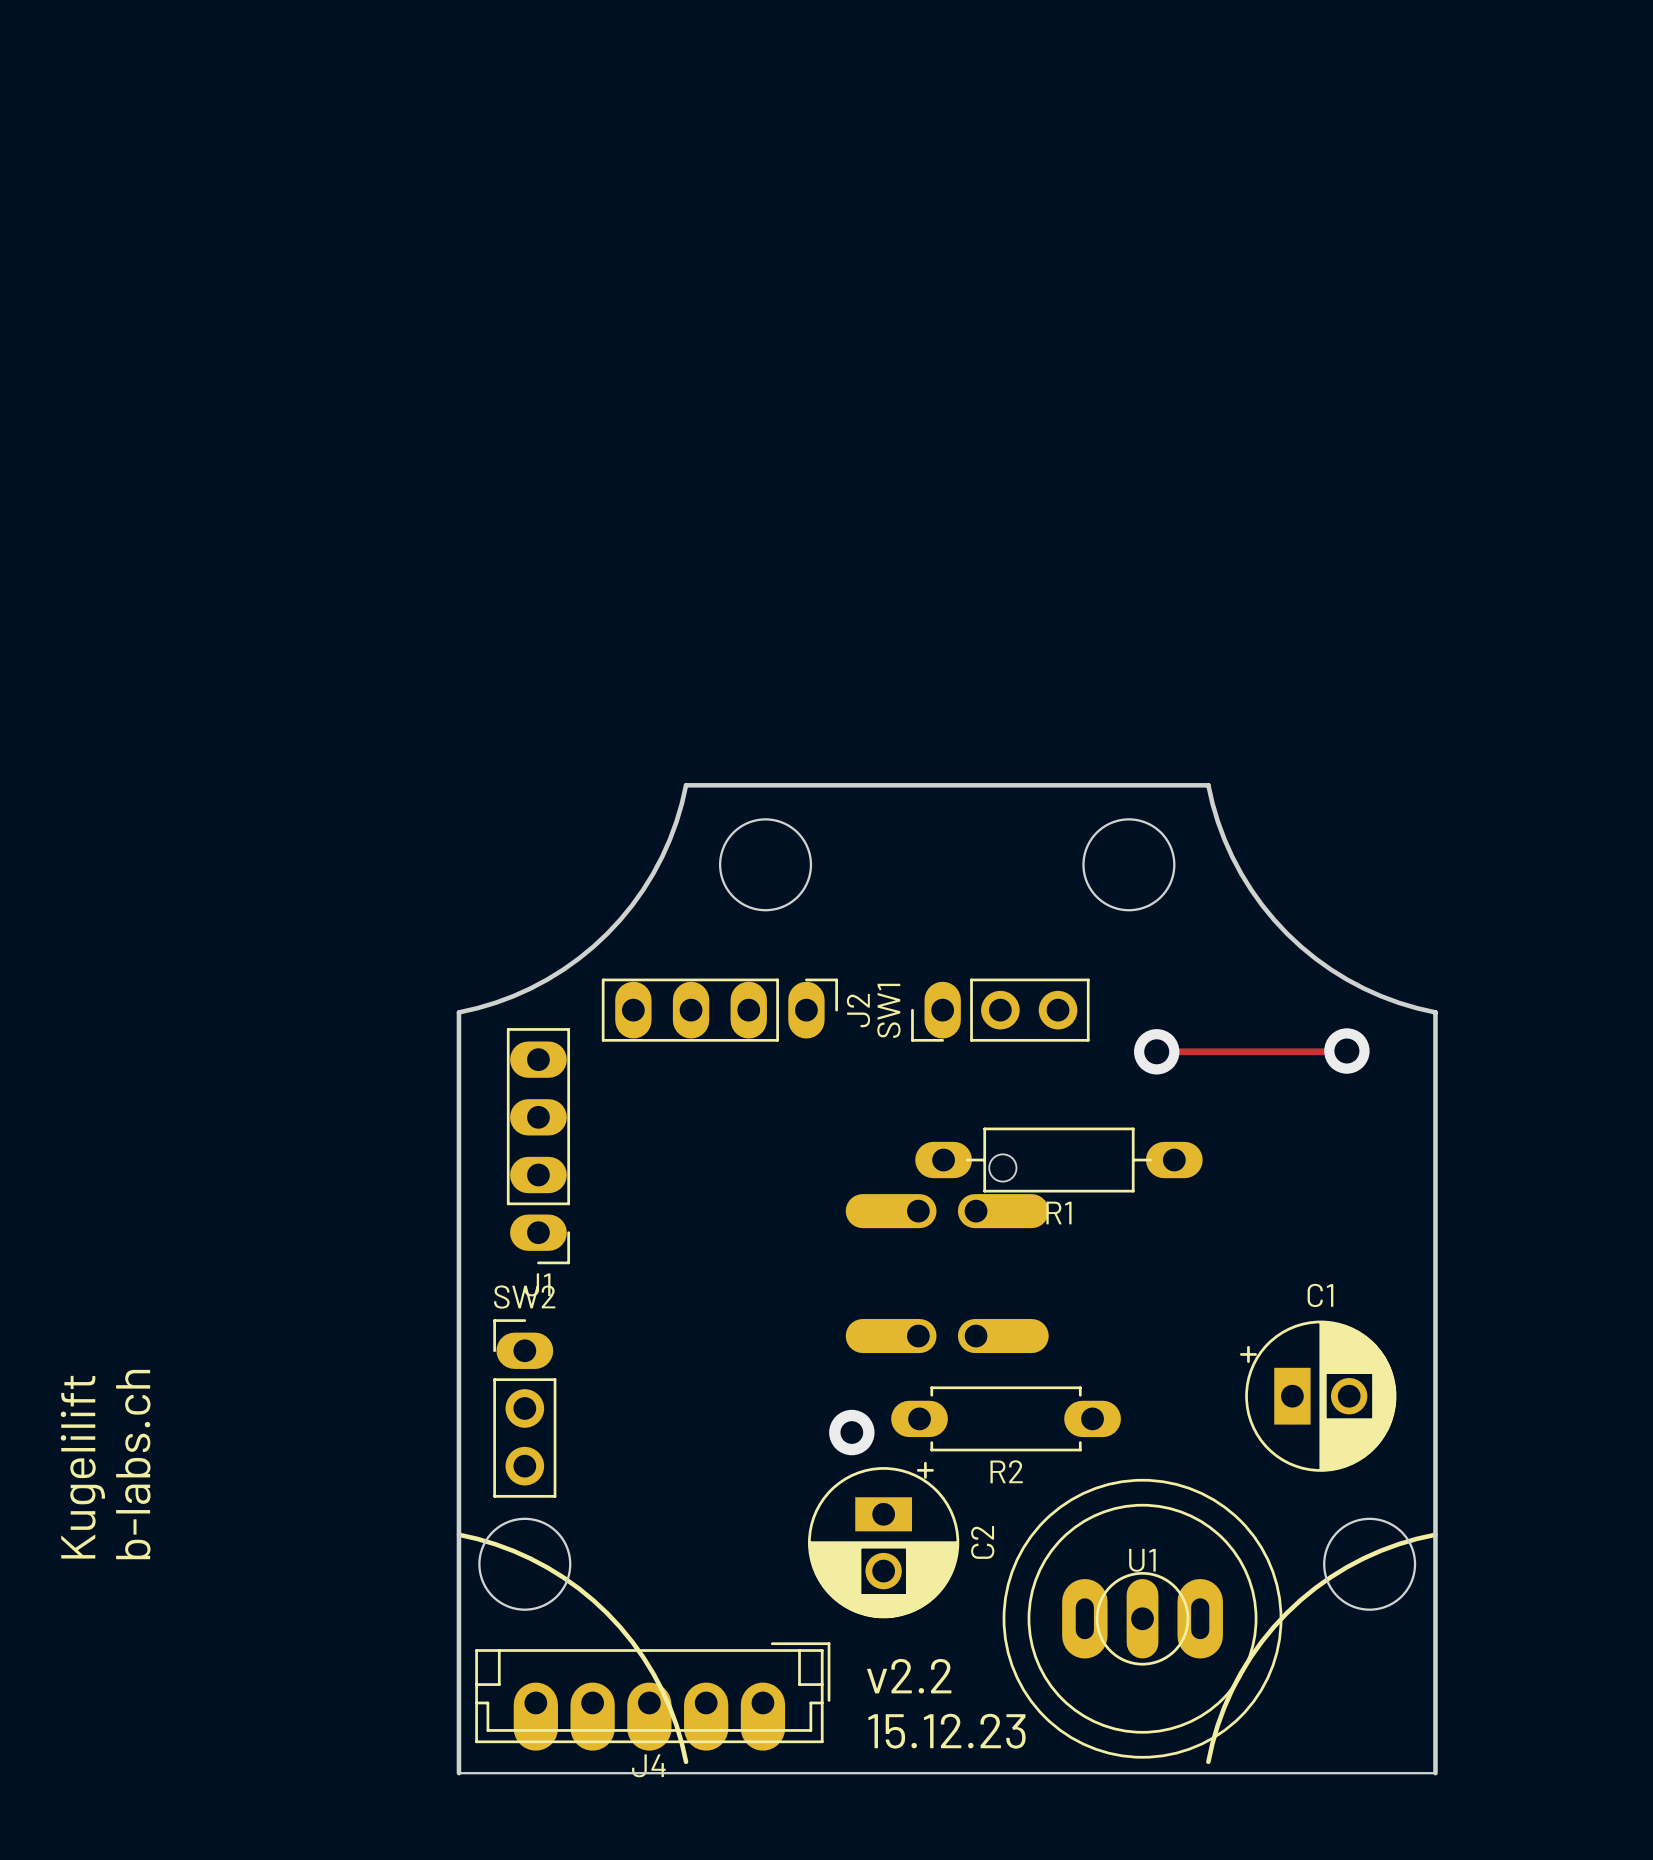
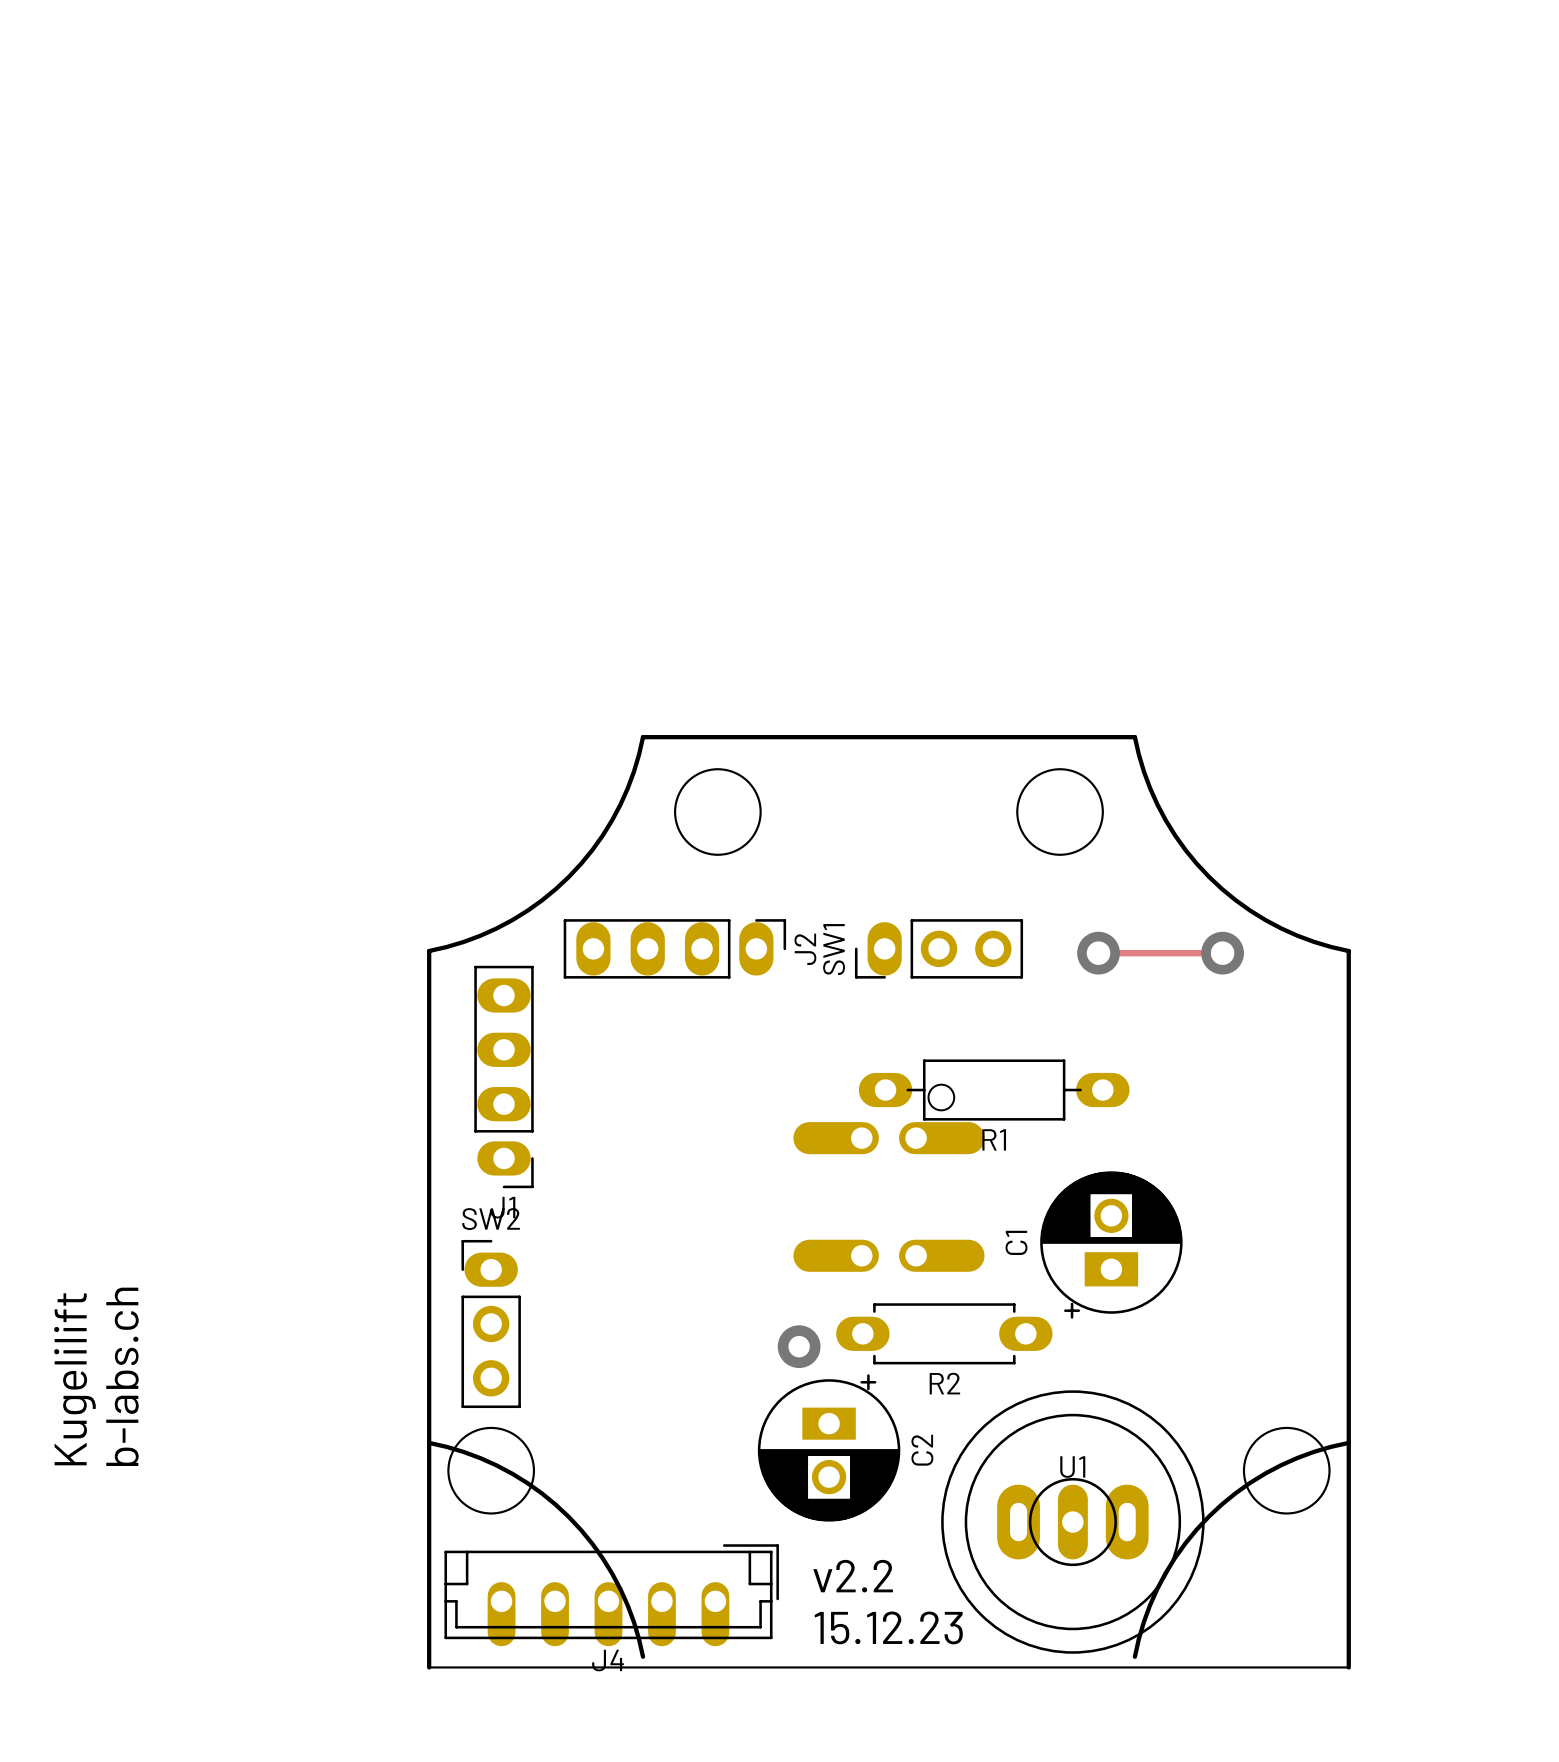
track: none -> (1098, 953) (1222, 953)
via position: (1156, 1051) -> (1098, 953)
track: (1346, 1051) (1156, 1051) -> none
via position: (1346, 1051) -> (1222, 953)
C1 rotation: 0° (1318, 1396) -> 90° counterclockwise (1111, 1245)
C1 position: (1318, 1396) -> (1111, 1245)
J4 footprint: [475, 1642, 831, 1751] -> [444, 1544, 779, 1647]

